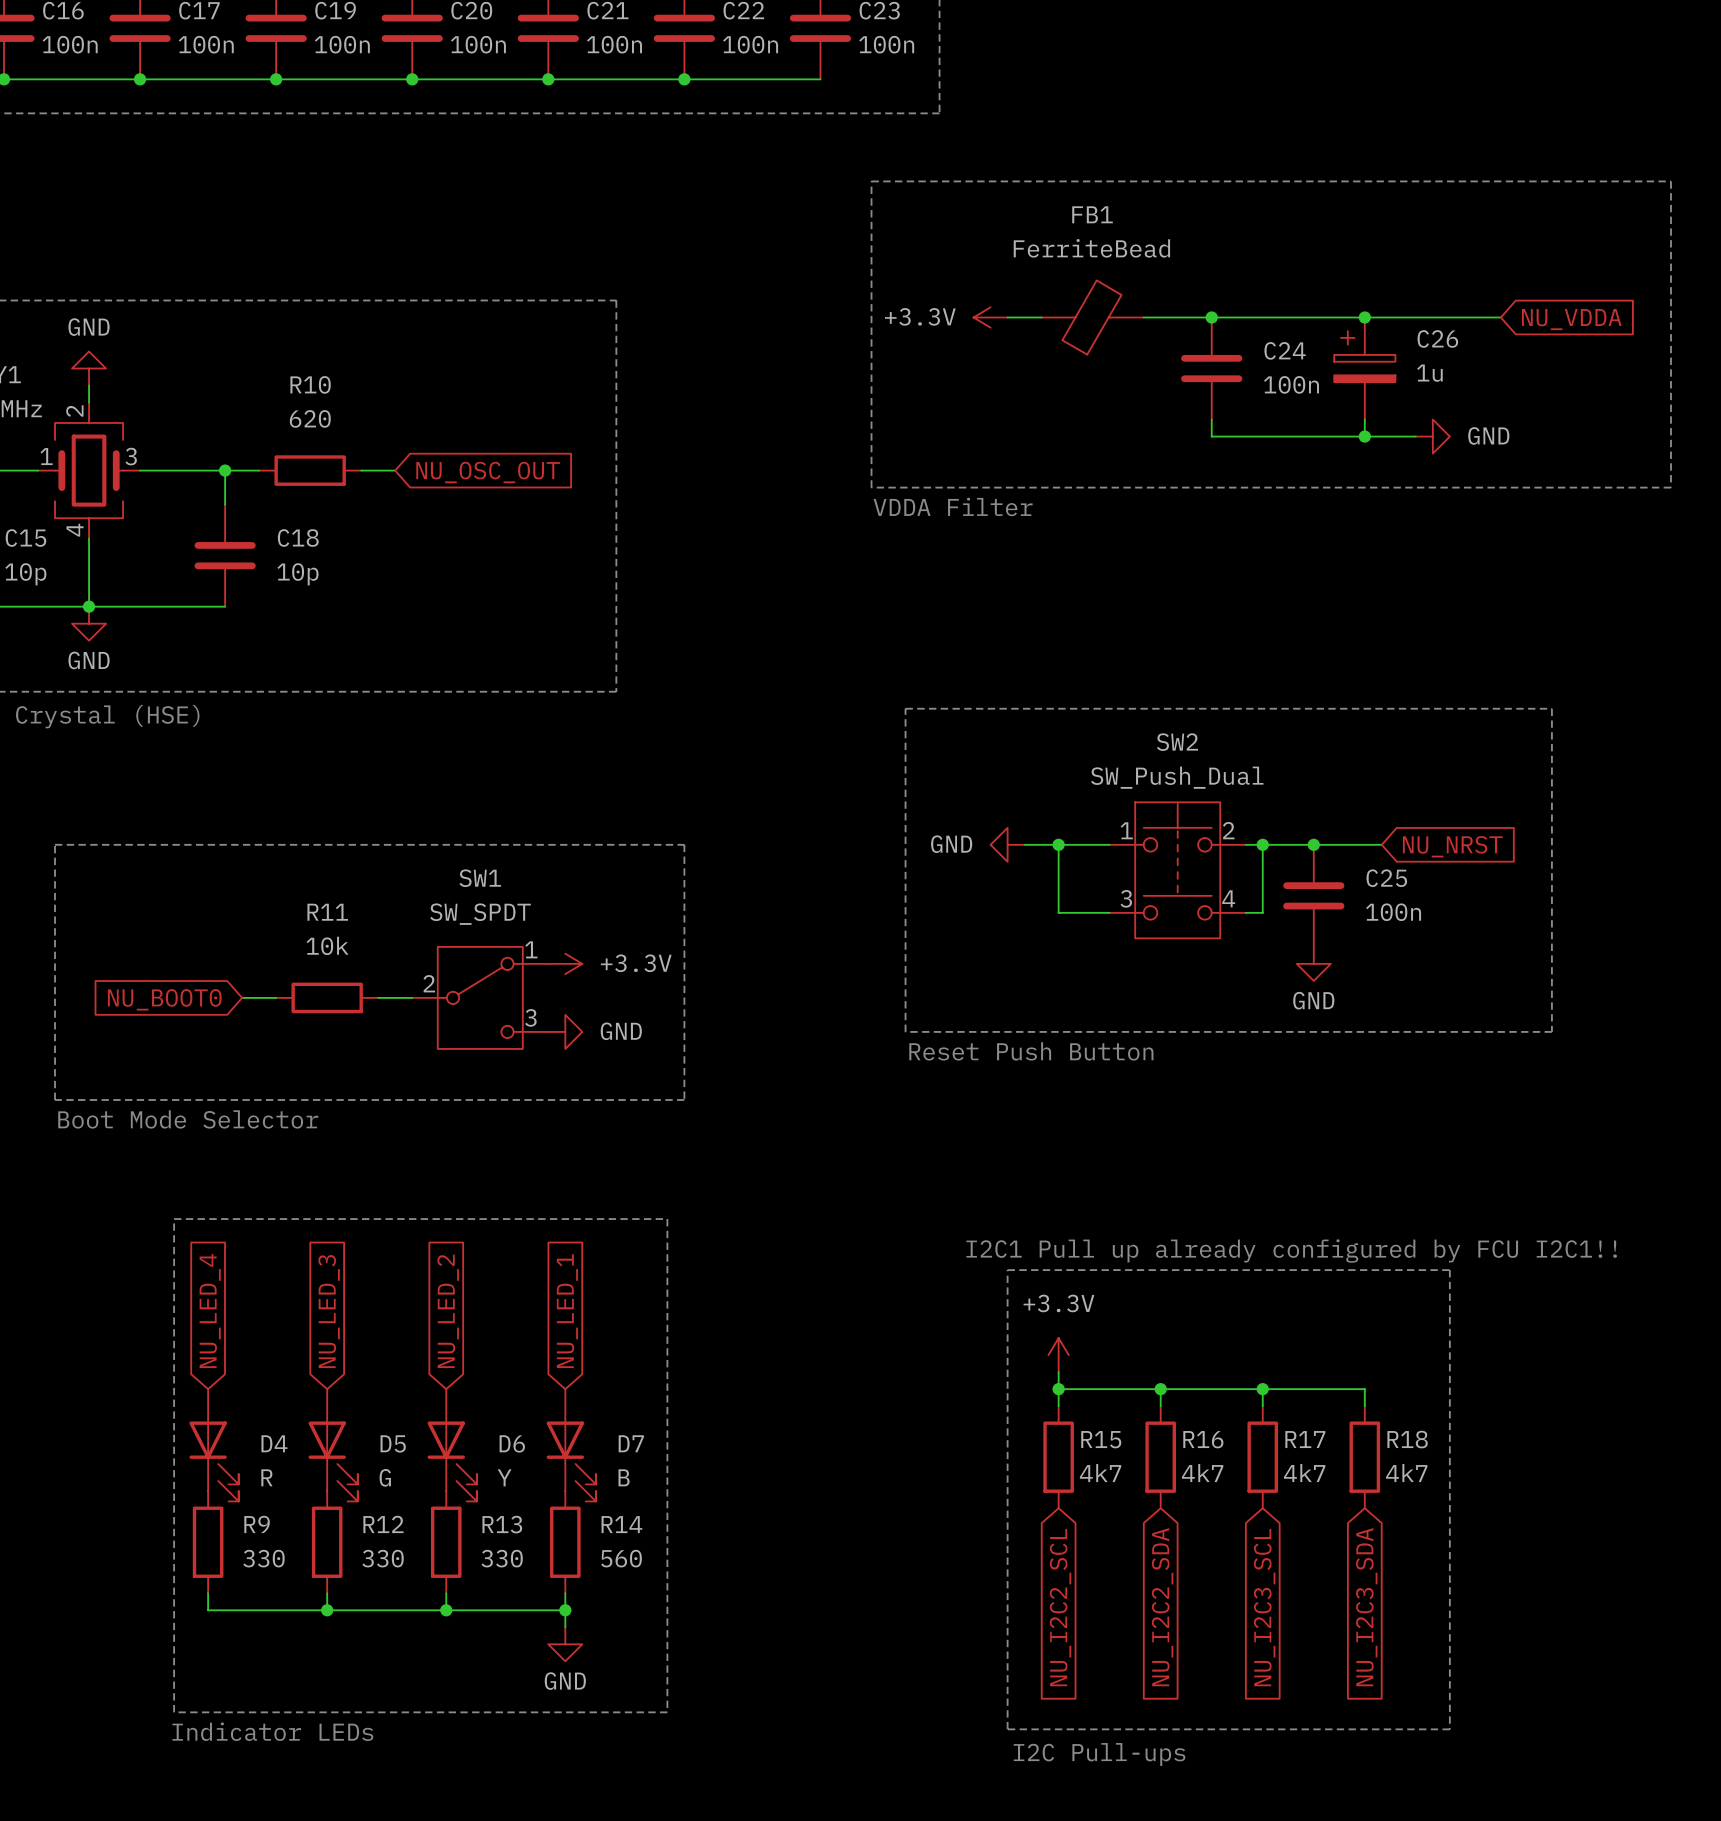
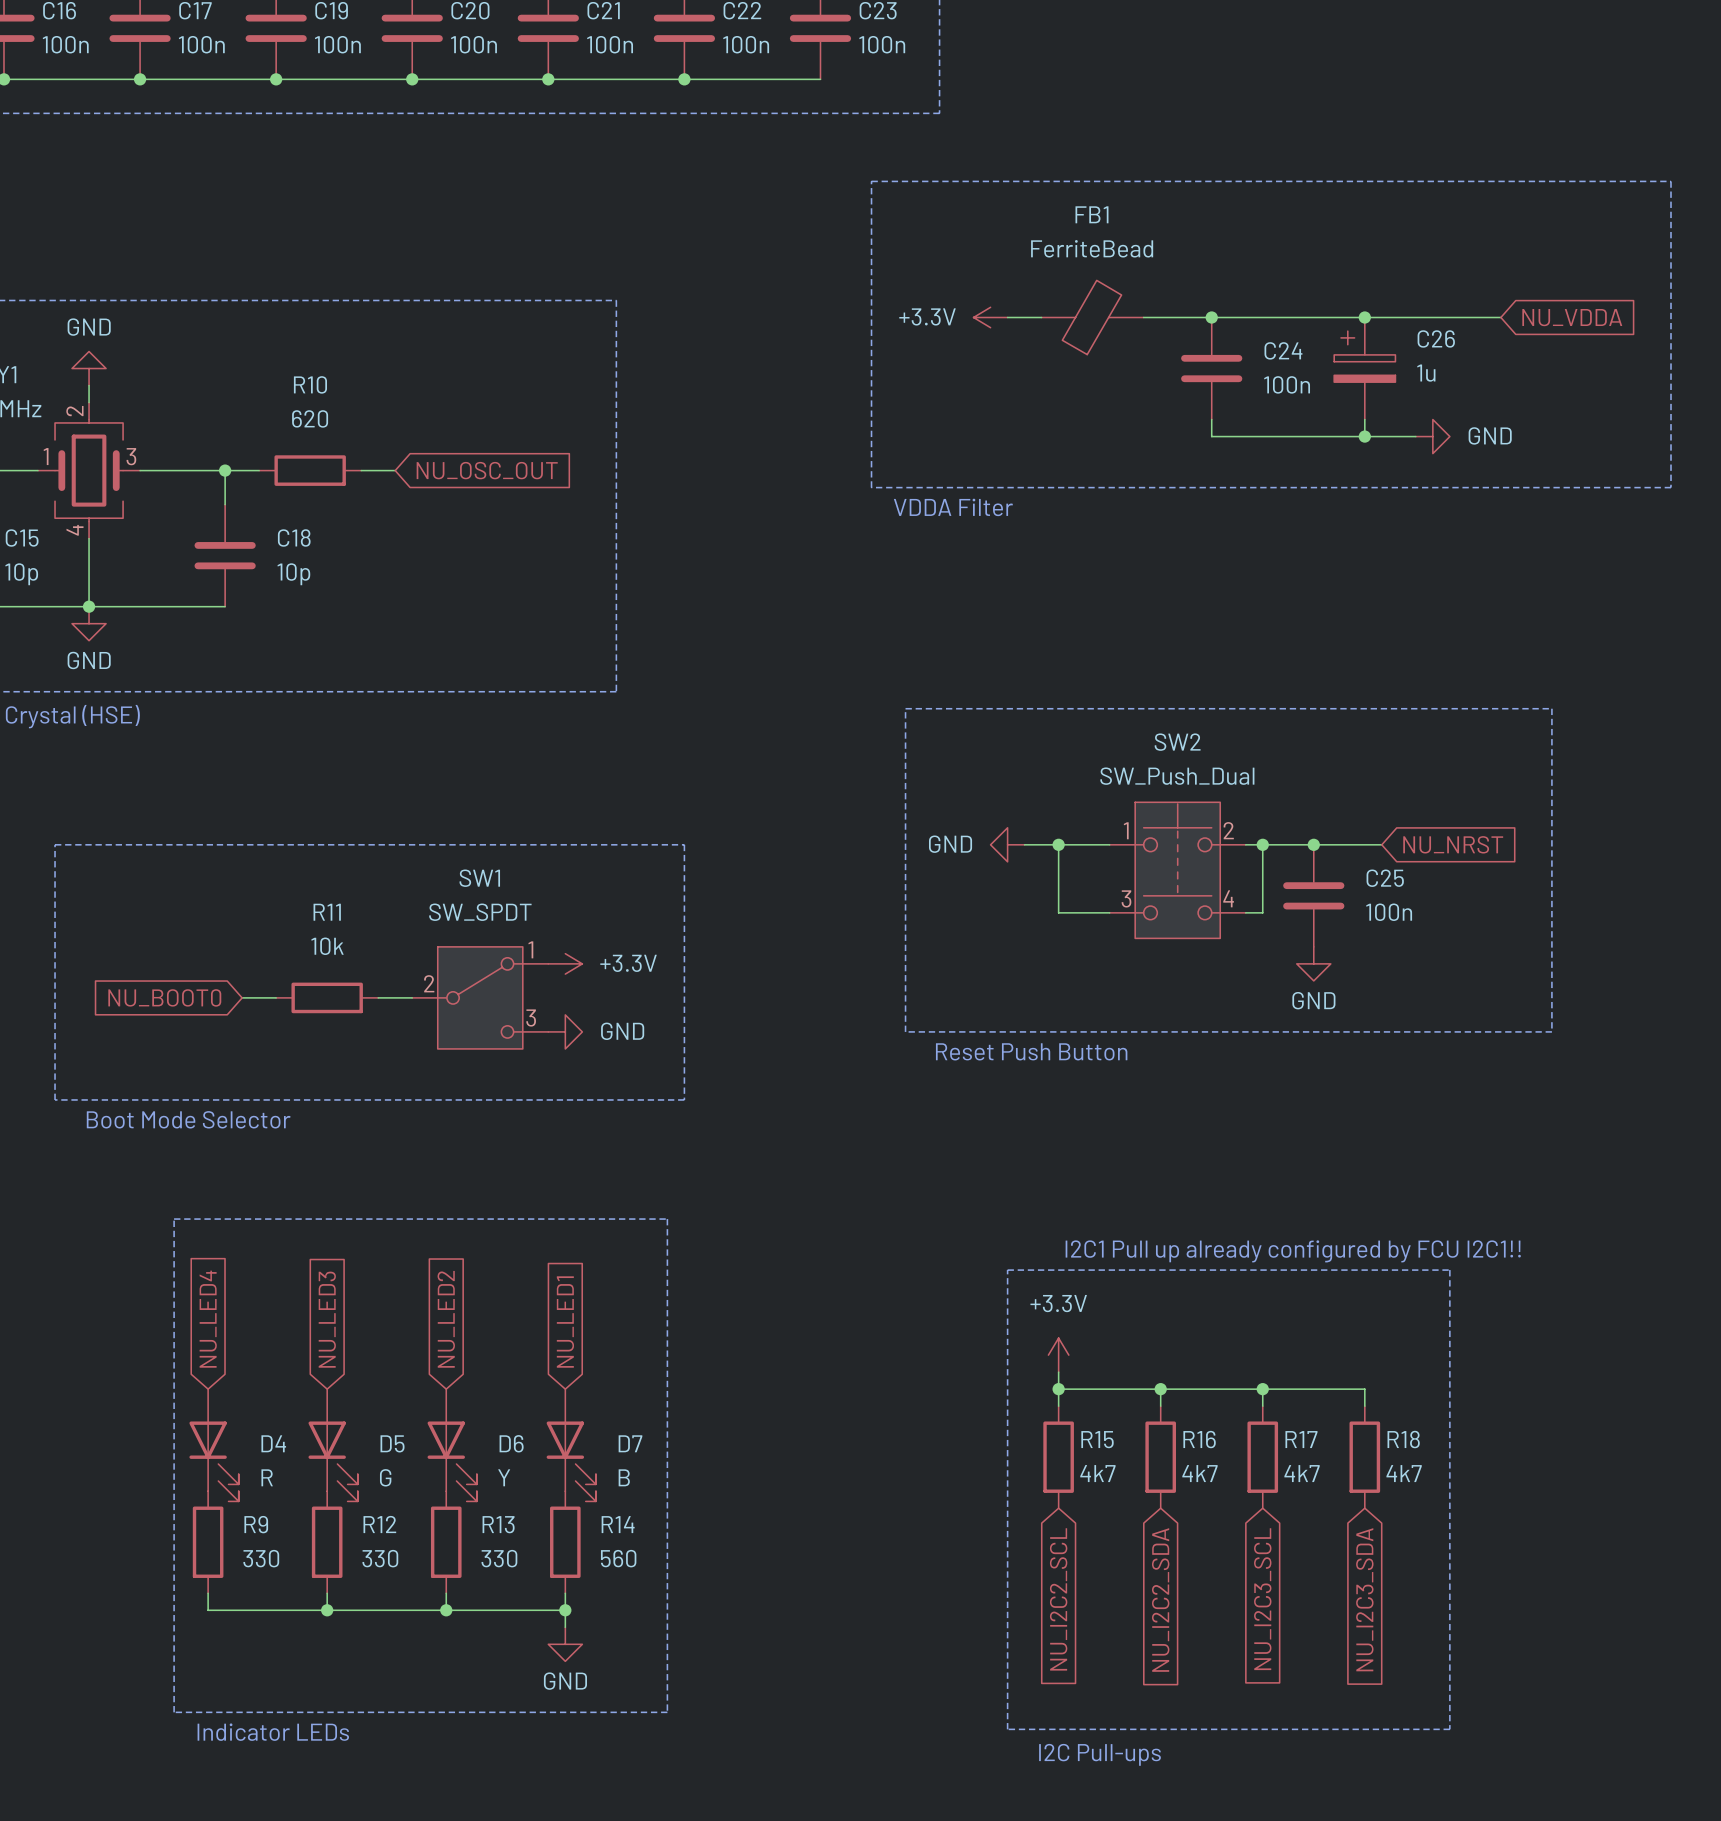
global label: NU_LED_4 (210, 1311) -> NU_LED4 (208, 1319)
global label: NU_LED_3 (329, 1311) -> NU_LED3 (327, 1319)
global label: NU_LED_2 (448, 1311) -> NU_LED2 (446, 1319)
global label: NU_LED_1 (567, 1311) -> NU_LED1 (565, 1322)

